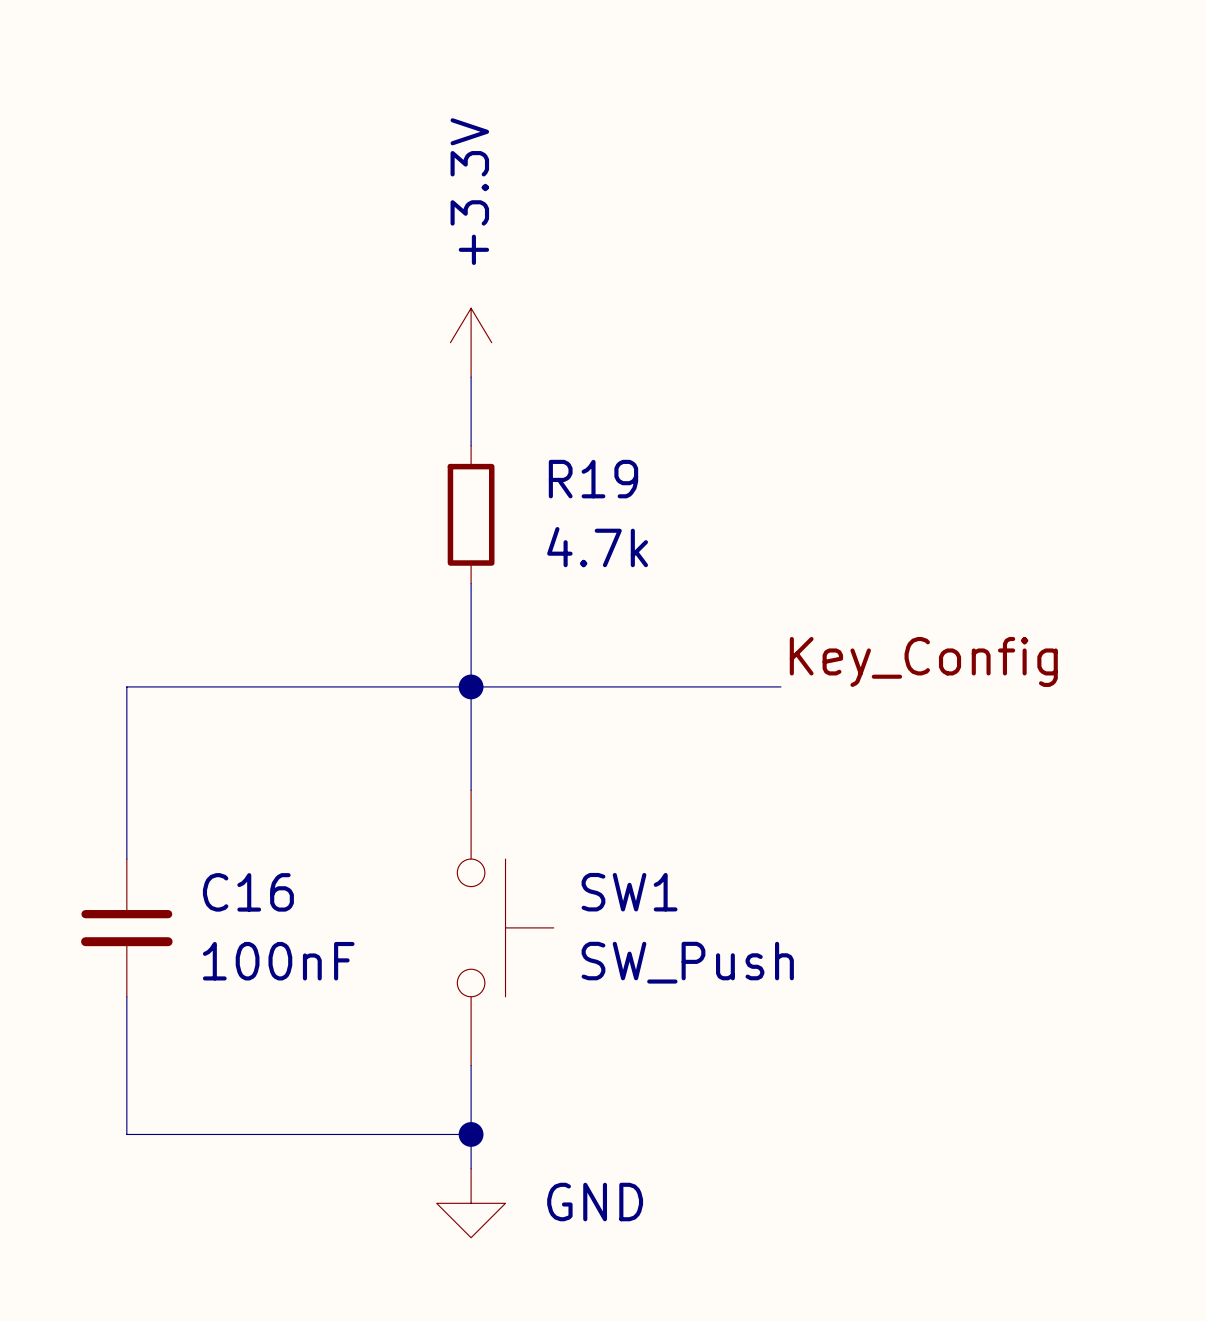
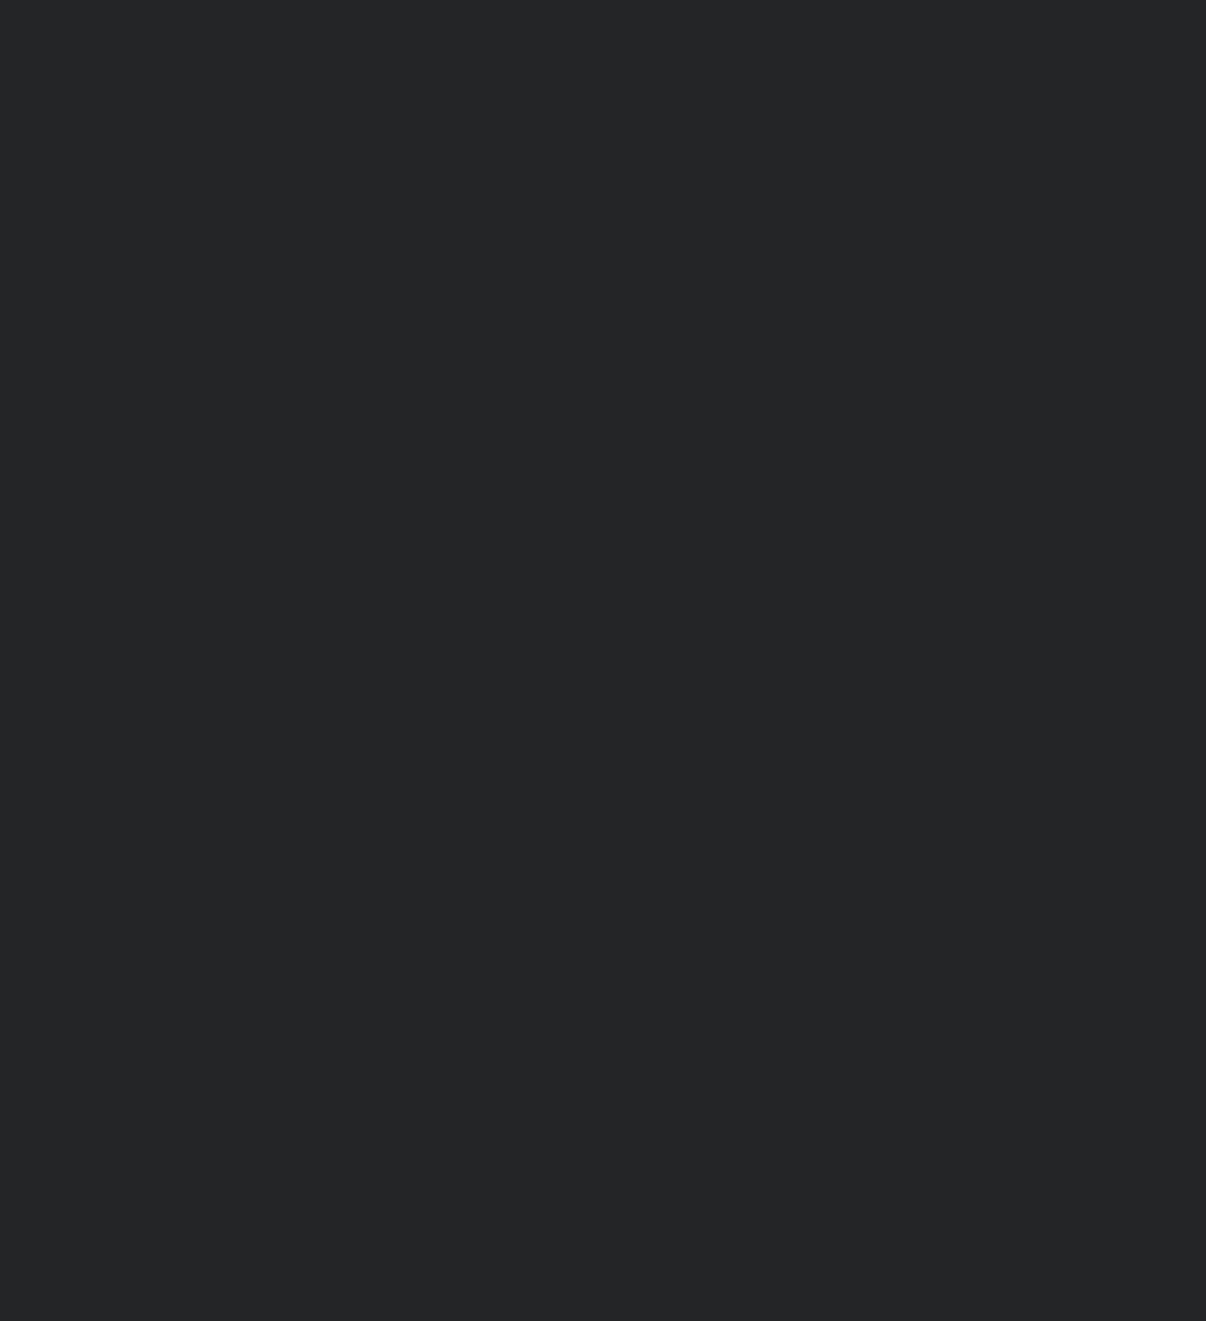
power symbol: +3.3V (471, 342) -> none
wire: (471, 377) (471, 445) -> none
R19: 4.7k (471, 514) -> none
wire: (471, 583) (471, 790) -> none
label: Key_Config (923, 661) -> none
junction: (471, 686) -> none
wire: (780, 686) (126, 686) (126, 859) -> none
C16: 100nF (126, 927) -> none
SW1: SW_Push (505, 927) -> none
wire: (126, 996) (126, 1134) (471, 1134) -> none
wire: (471, 1065) (471, 1168) -> none
junction: (471, 1134) -> none
power symbol: GND (471, 1203) -> none

